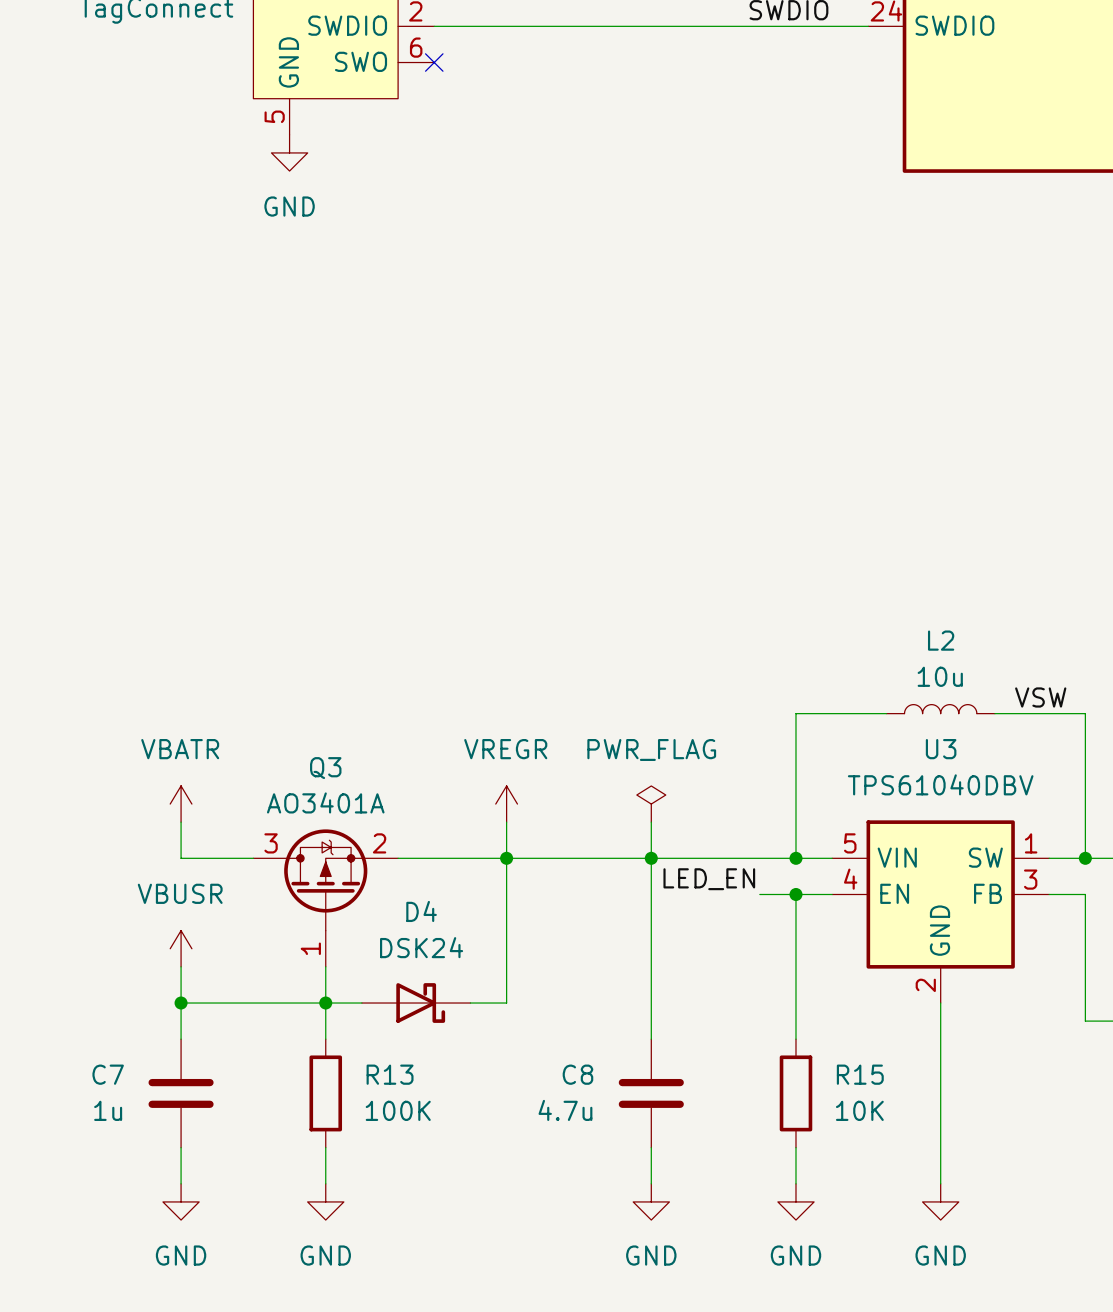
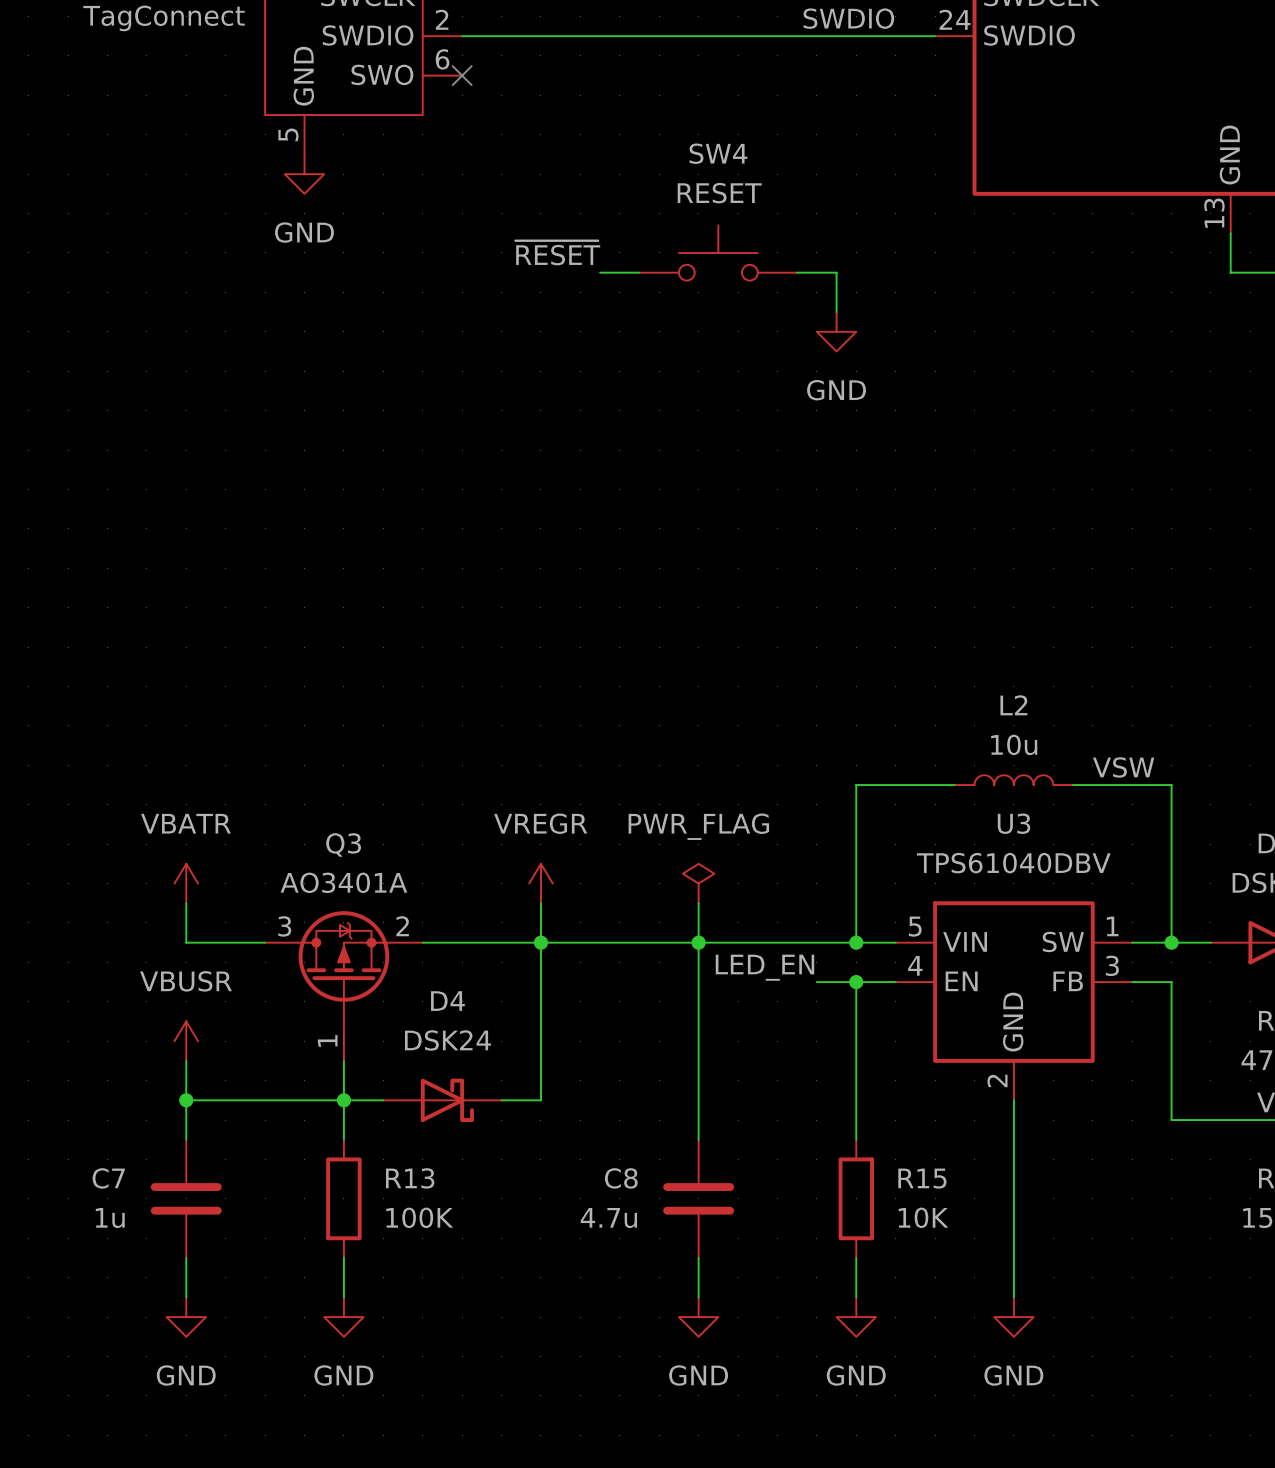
label: none -> ~{RESET} (557, 253)
SW4: none -> RESET (718, 252)
wire: none -> (600, 272) (639, 272)
wire: none -> (797, 272) (836, 272) (836, 312)
power symbol: none -> GND (836, 331)

